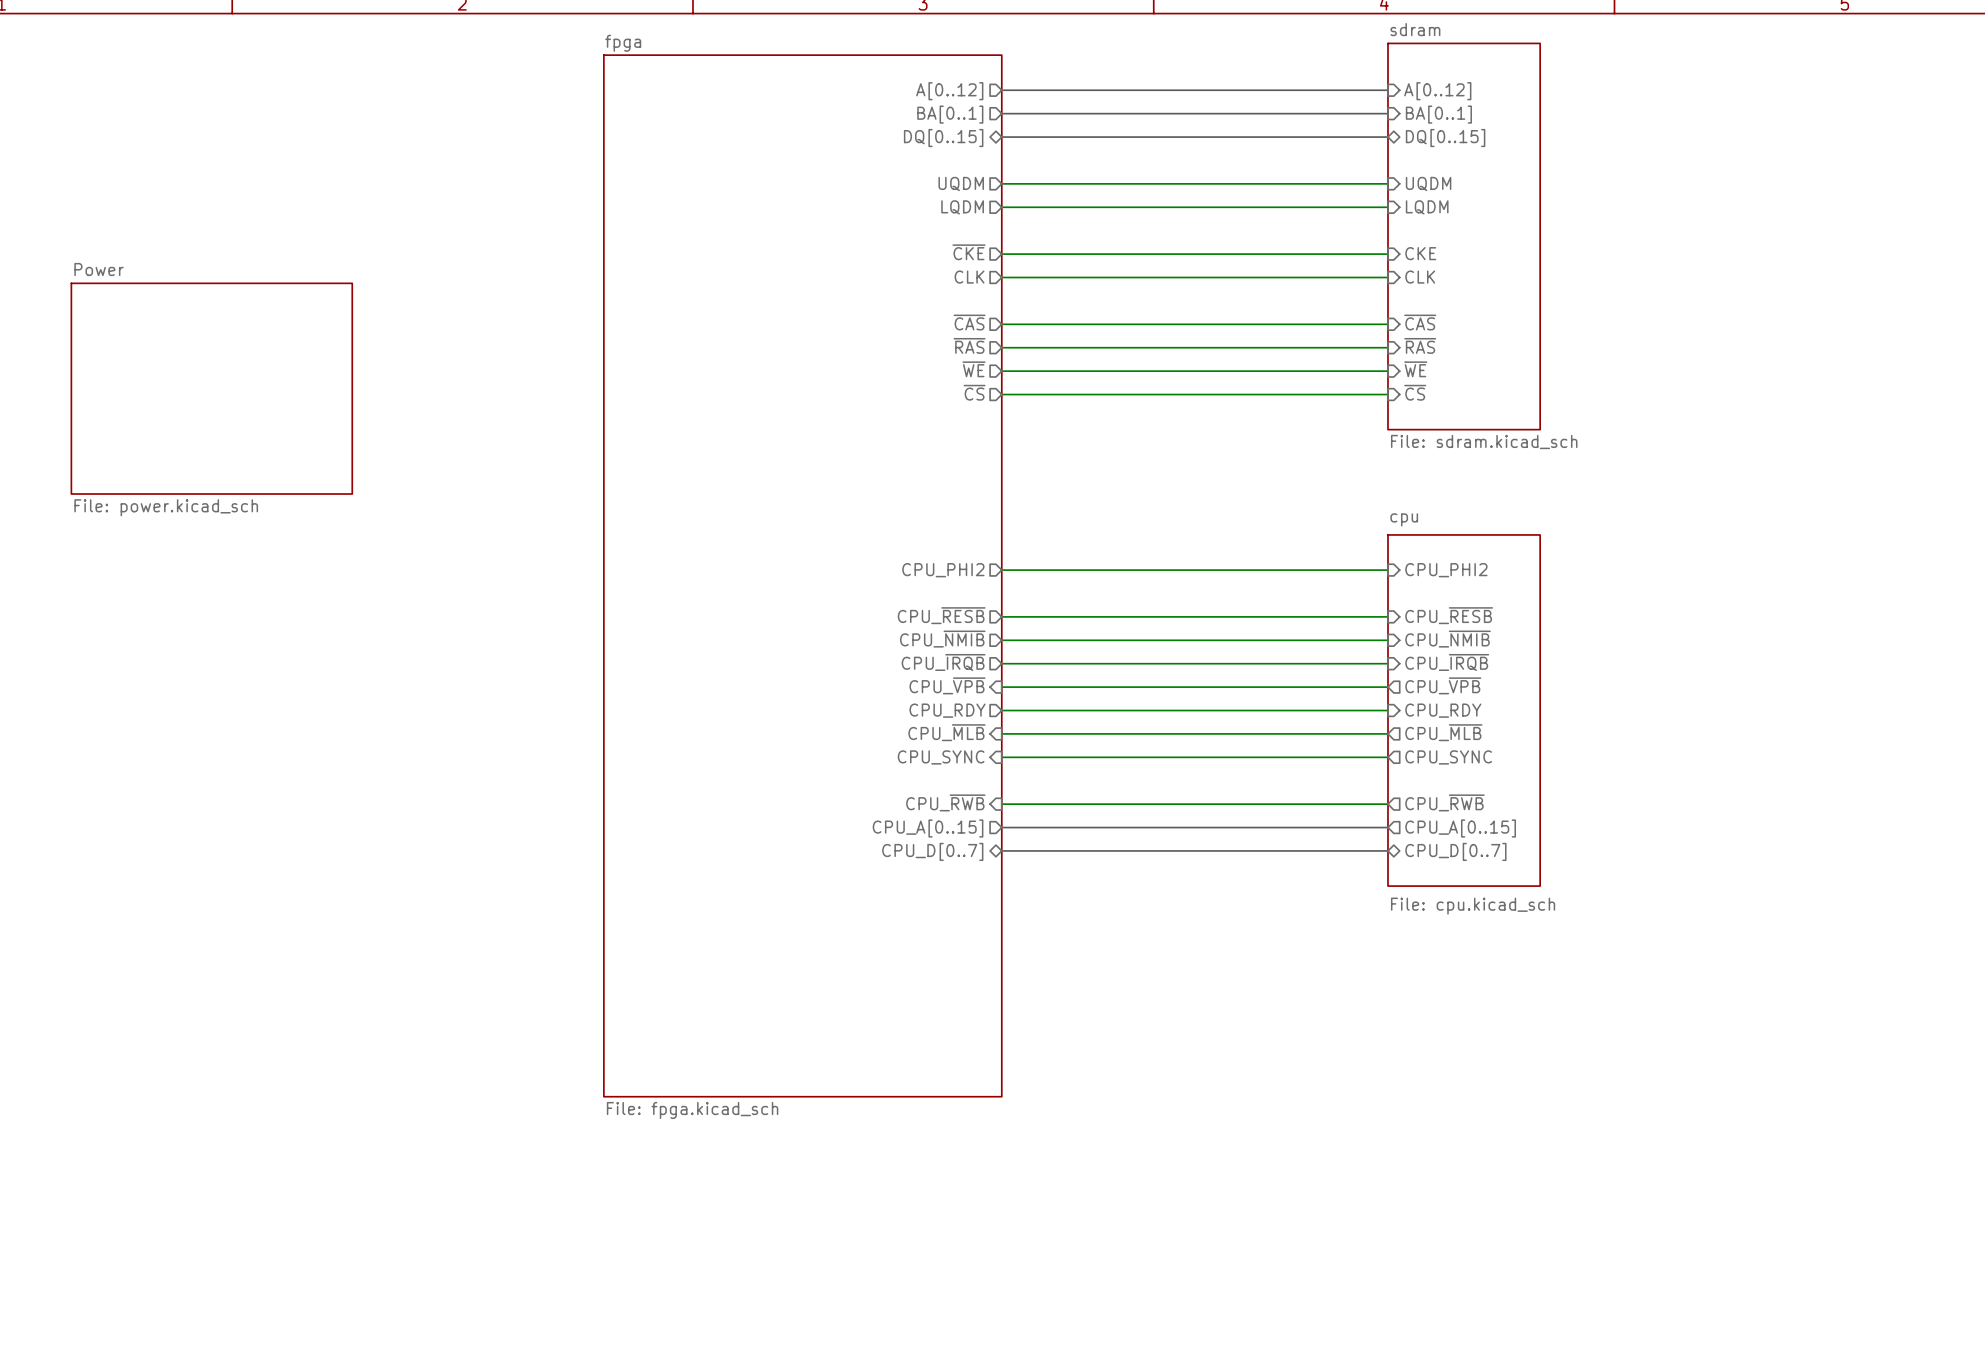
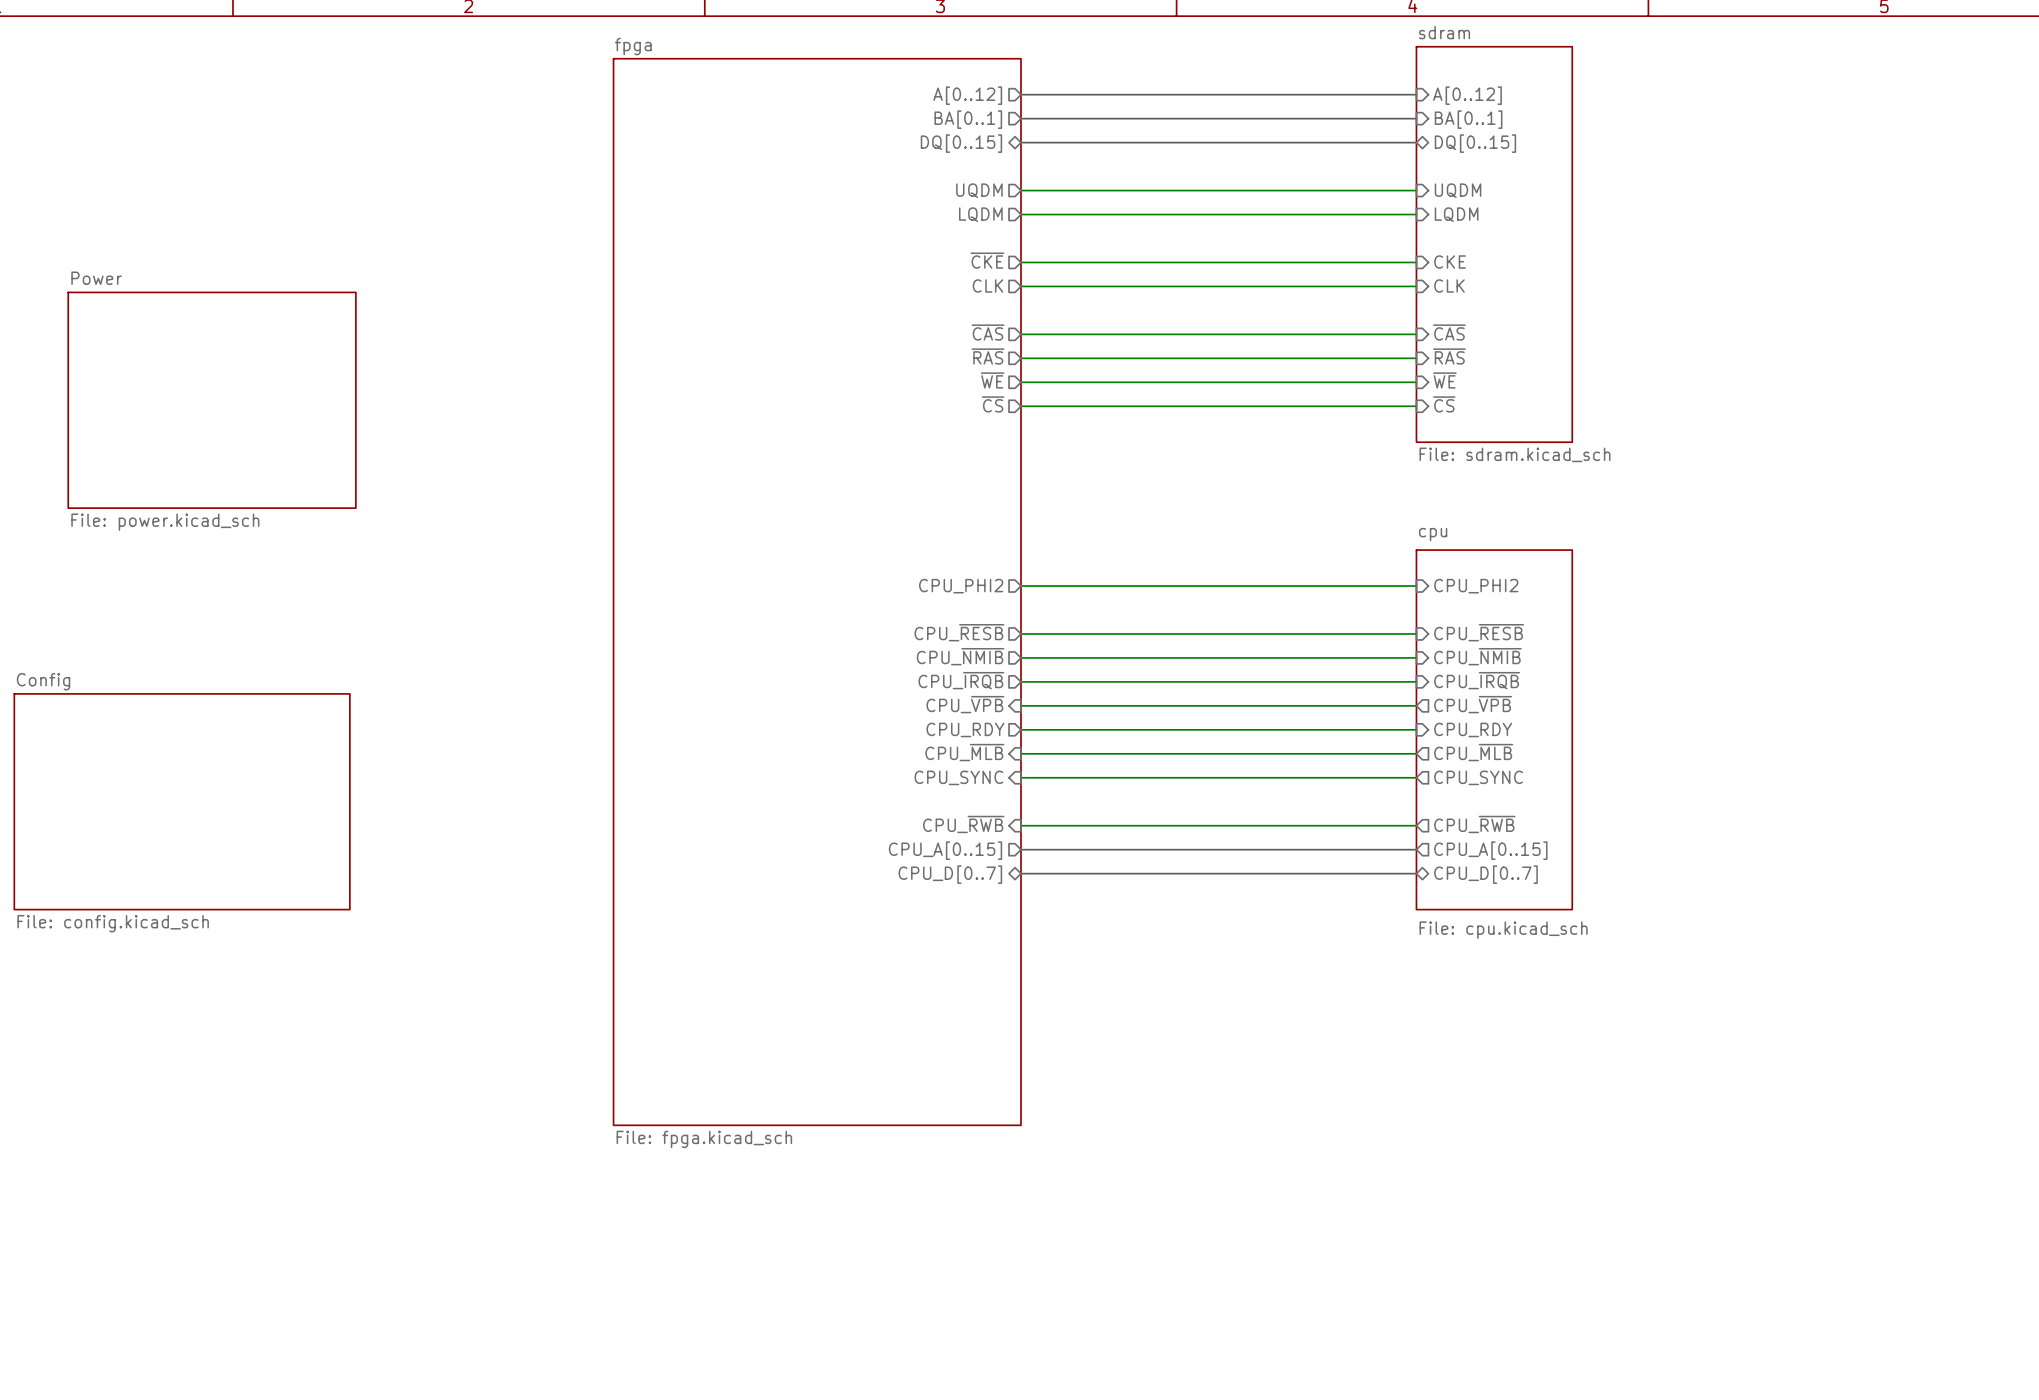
sheet Config: none -> File: config.kicad_sch (182, 801)

